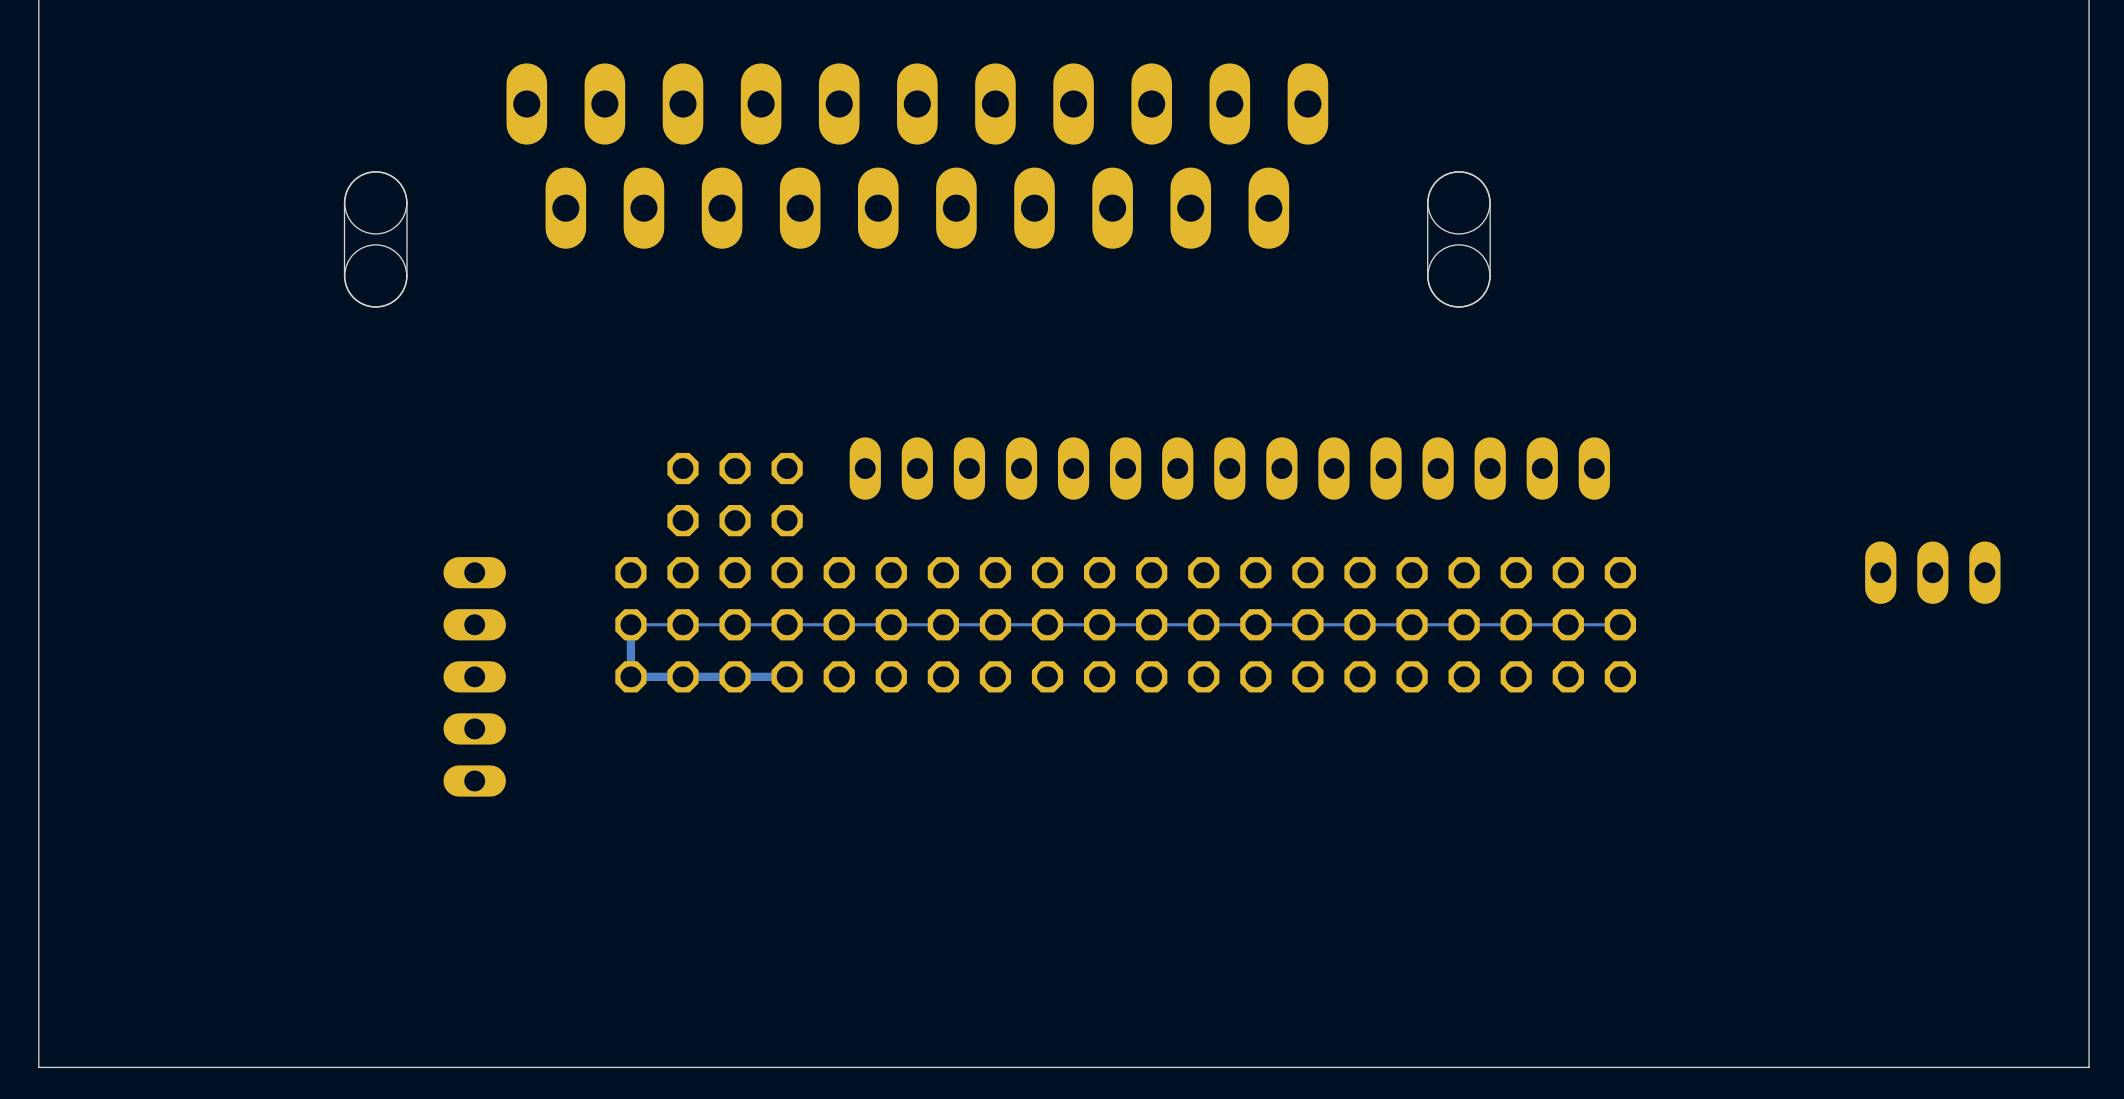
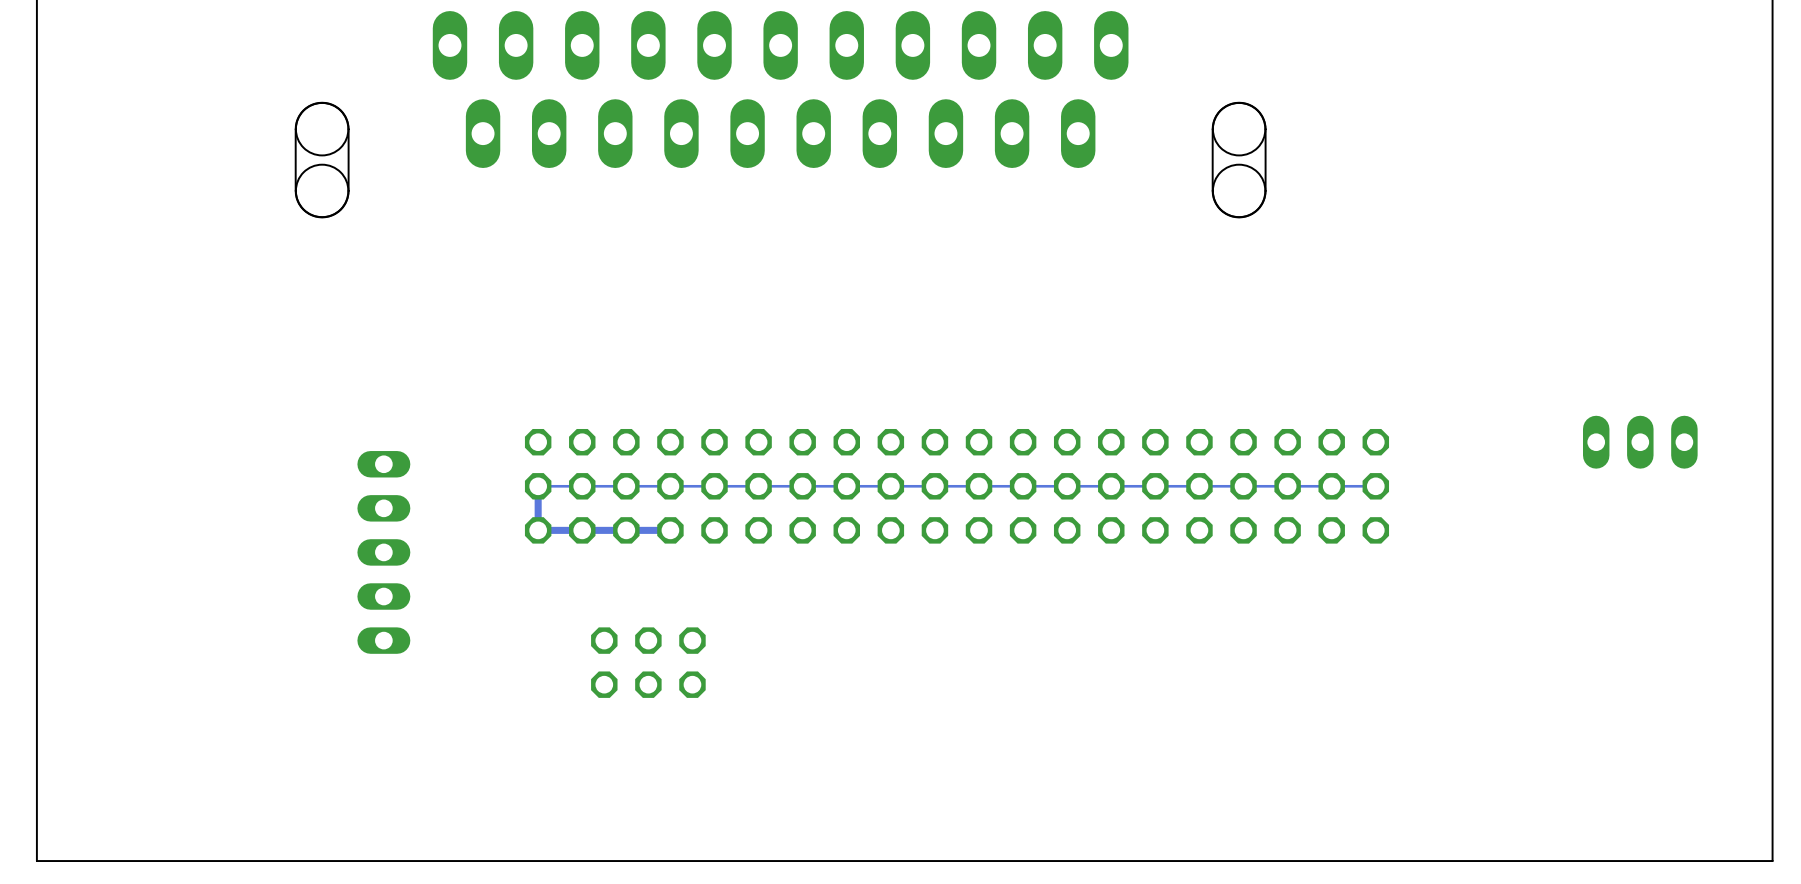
part: (1151, 468) -> none
part: (1542, 468) -> none
part position: (735, 494) -> (648, 662)
part position: (474, 676) -> (383, 552)

